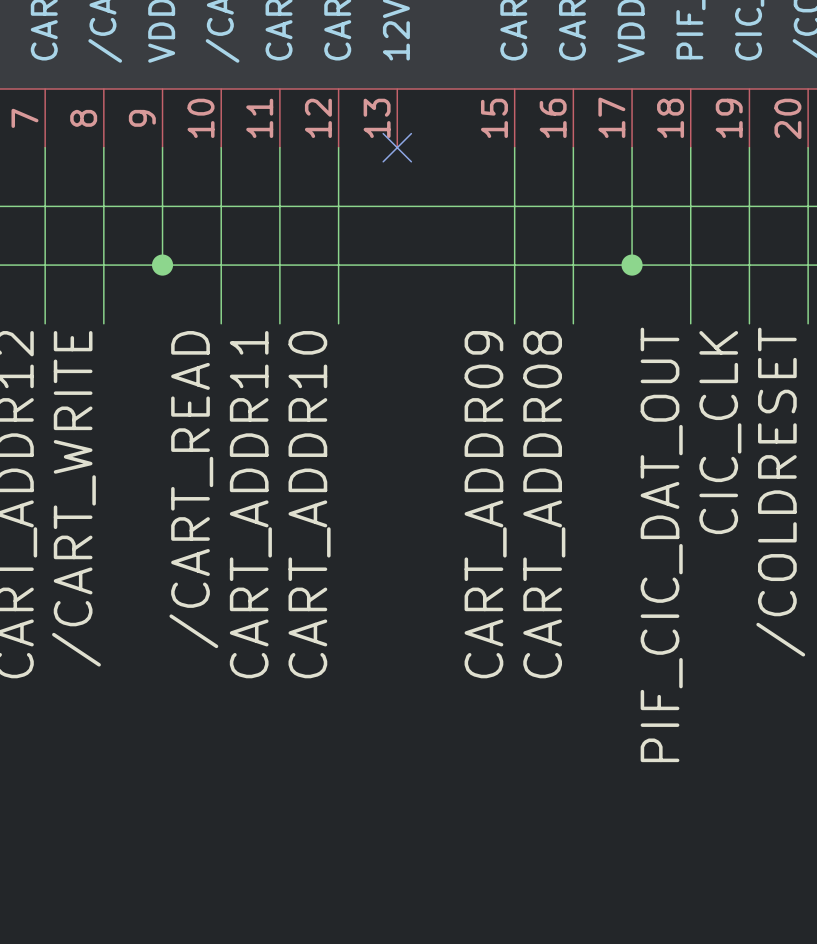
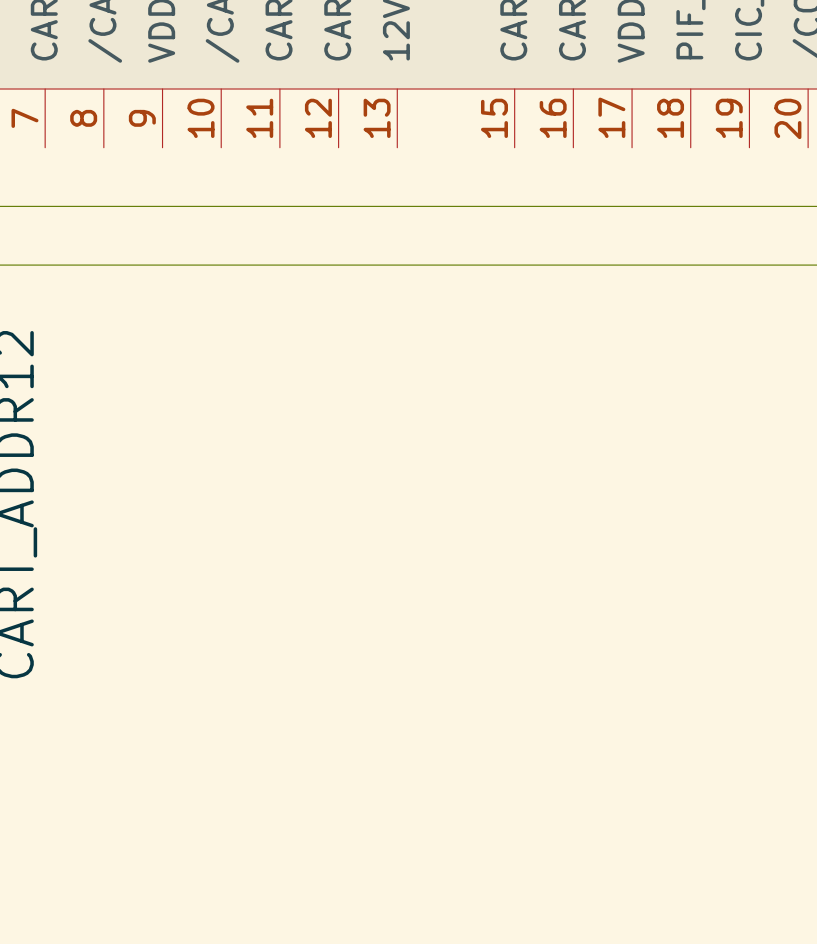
wire: (45, 147) (45, 323) -> none
wire: (103, 147) (103, 323) -> none
wire: (162, 147) (162, 265) -> none
wire: (221, 147) (221, 323) -> none
wire: (279, 147) (279, 323) -> none
wire: (338, 147) (338, 323) -> none
no-connect mark: (397, 147) -> none
wire: (514, 147) (514, 323) -> none
wire: (573, 147) (573, 323) -> none
wire: (632, 147) (632, 265) -> none
wire: (690, 147) (690, 323) -> none
wire: (749, 147) (749, 323) -> none
wire: (808, 147) (808, 323) -> none
junction: (162, 265) -> none
junction: (632, 265) -> none
label: CIC_CLK (720, 432) -> none
label: /CART_READ (193, 489) -> none
label: /COLDRESET (780, 492) -> none
label: /CART_WRITE (76, 498) -> none
label: CART_ADDR11 (250, 504) -> none
label: CART_ADDR10 (309, 504) -> none
label: CART_ADDR09 (485, 504) -> none
label: CART_ADDR08 (544, 504) -> none
label: PIF_CIC_DAT_OUT (661, 544) -> none

